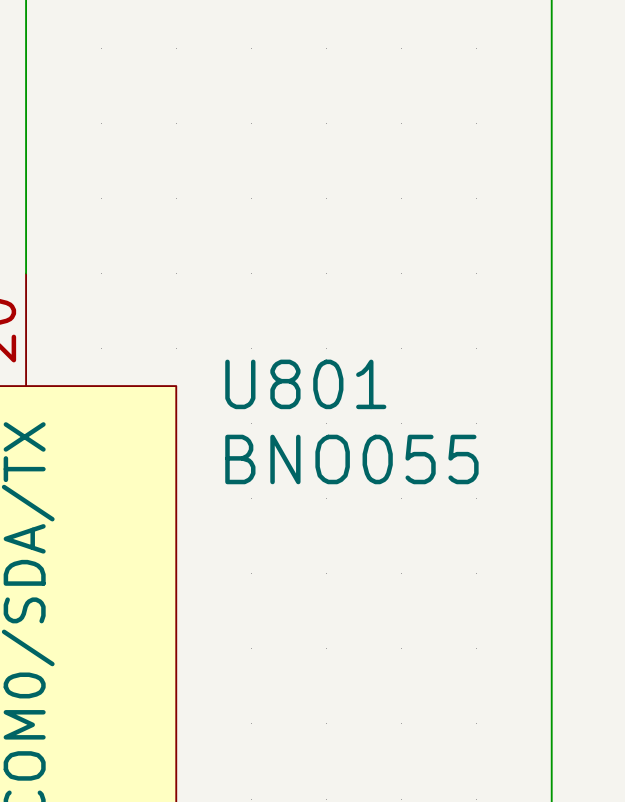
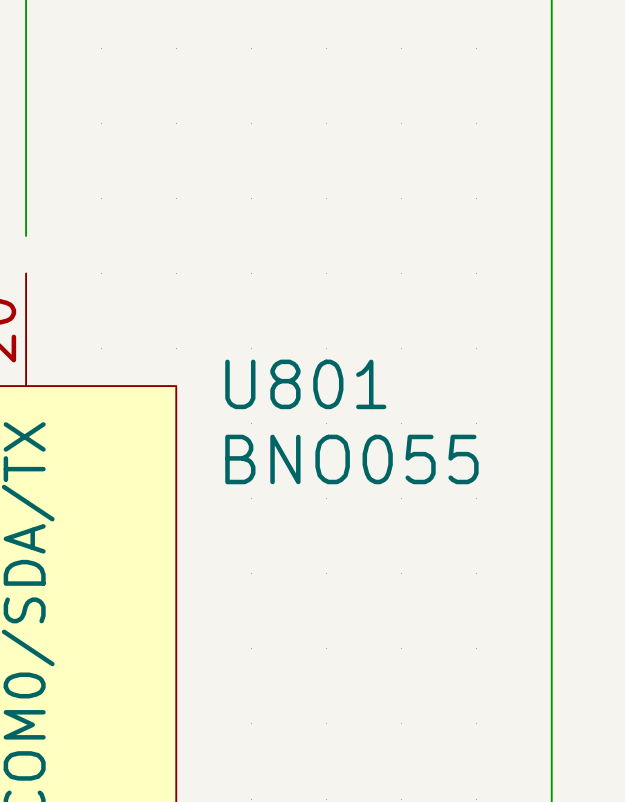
wire: (26, 235) (26, 273) -> none

